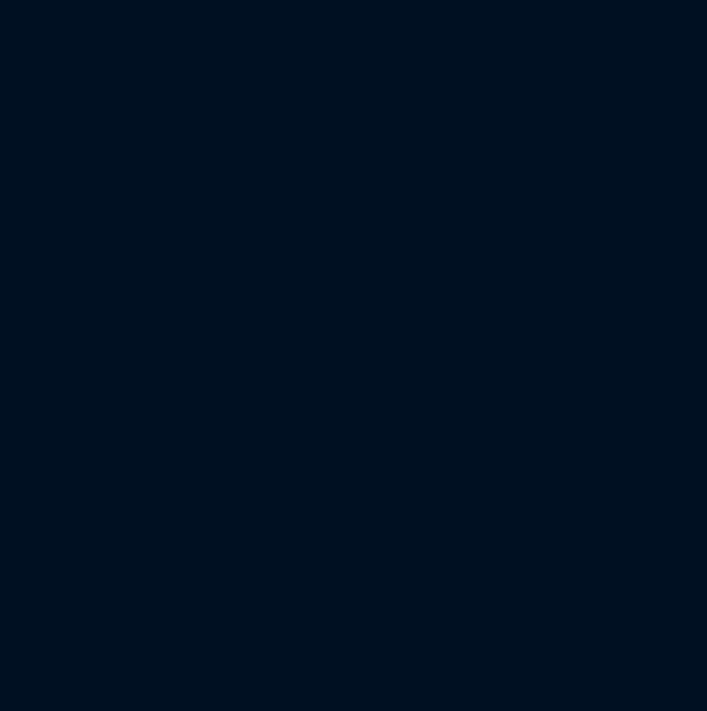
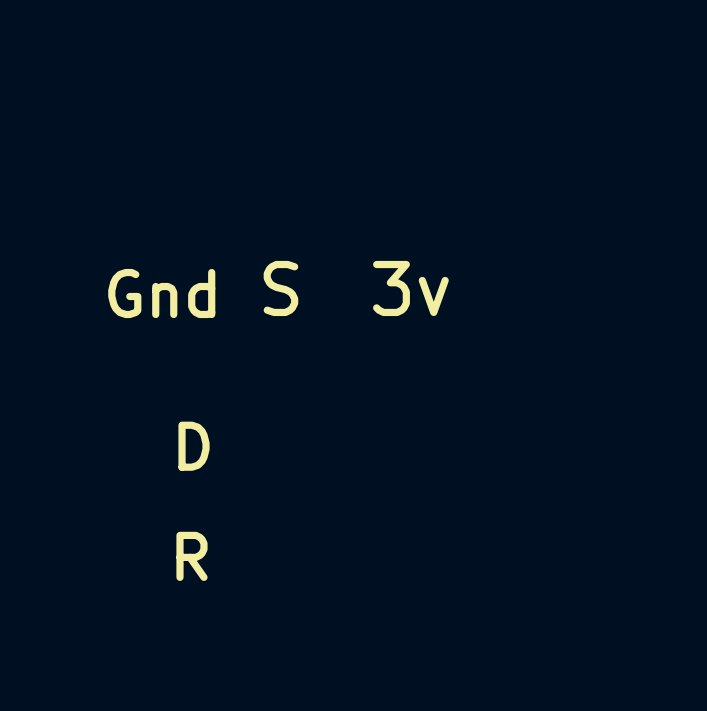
text: none -> S (280, 288)
text: none -> 3v (410, 288)
text: none -> Gnd (161, 293)
text: none -> D (194, 446)
text: none -> R (191, 556)

